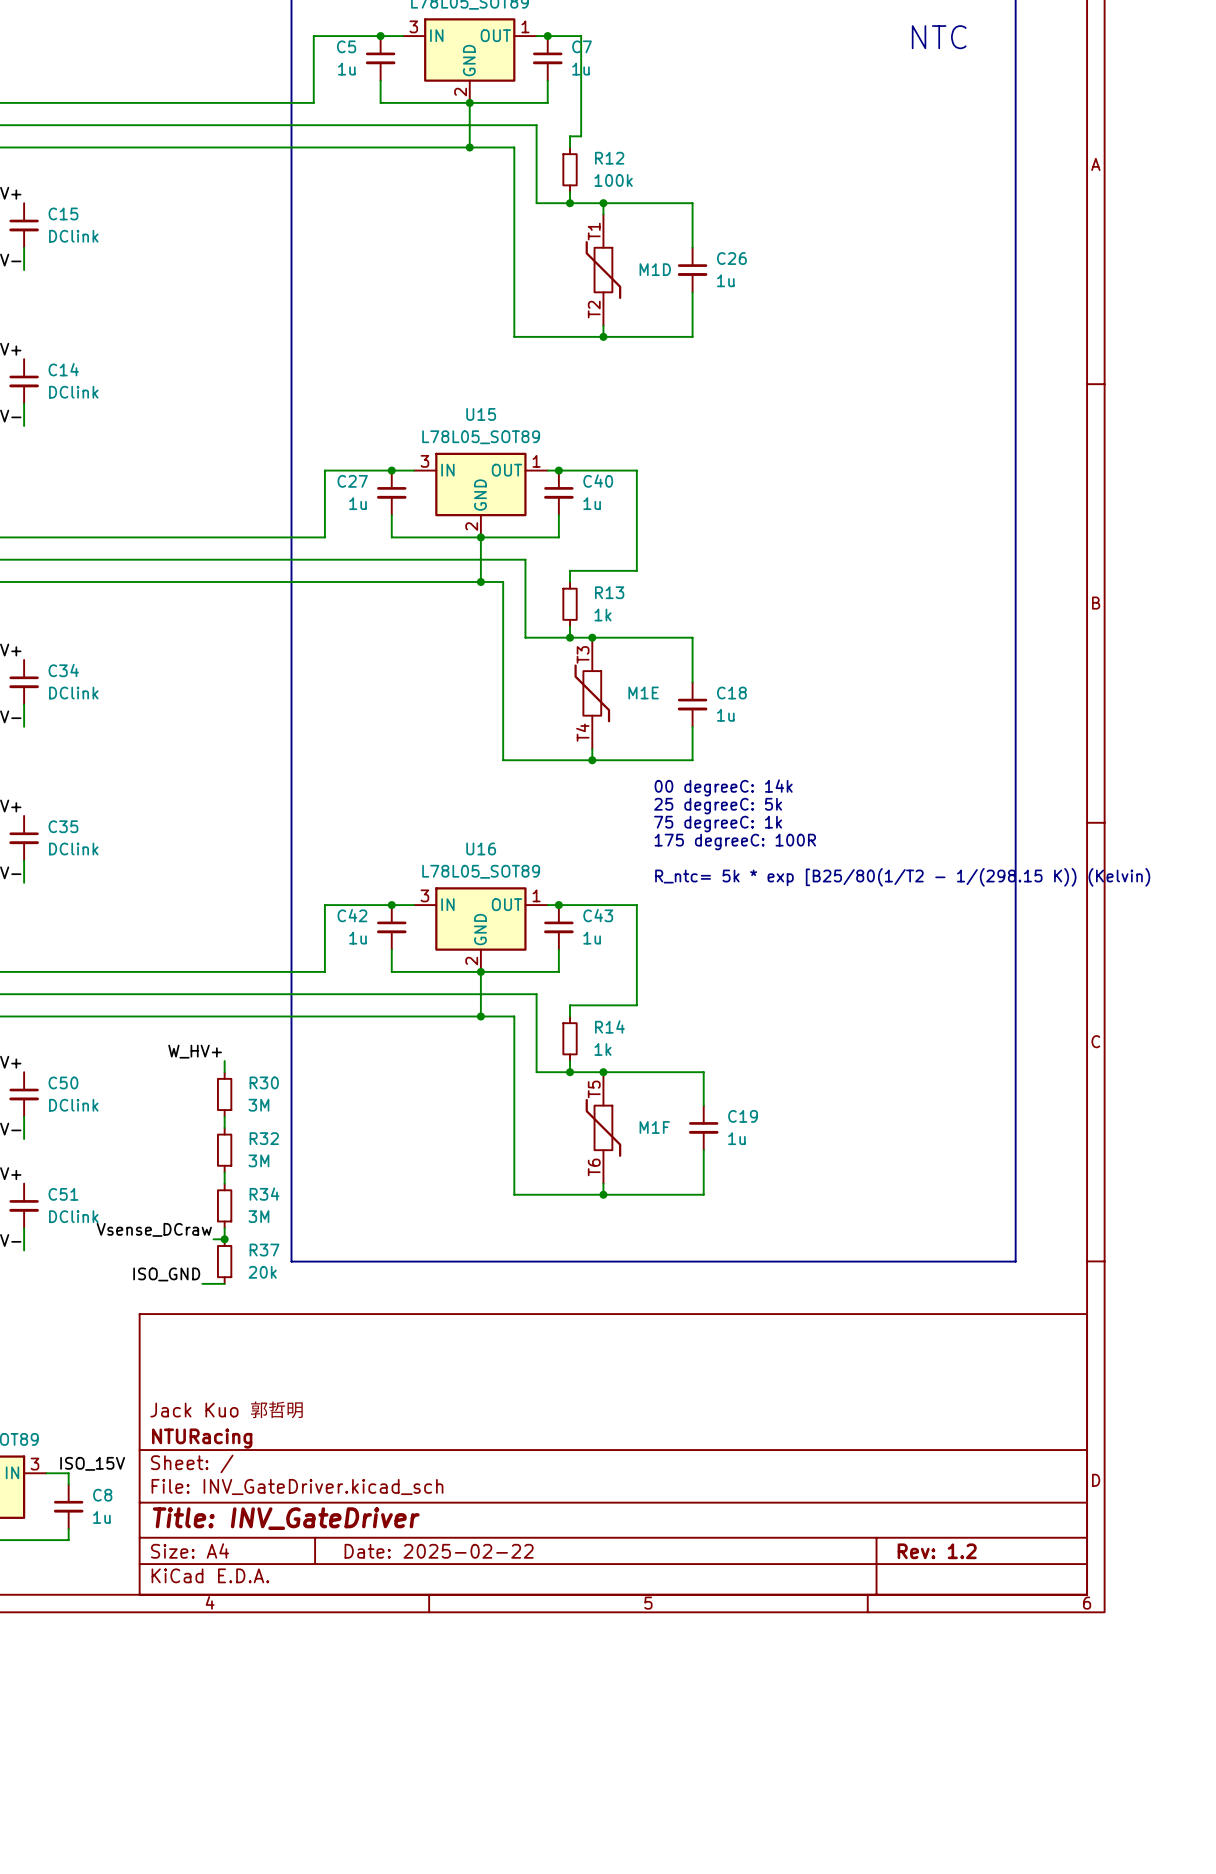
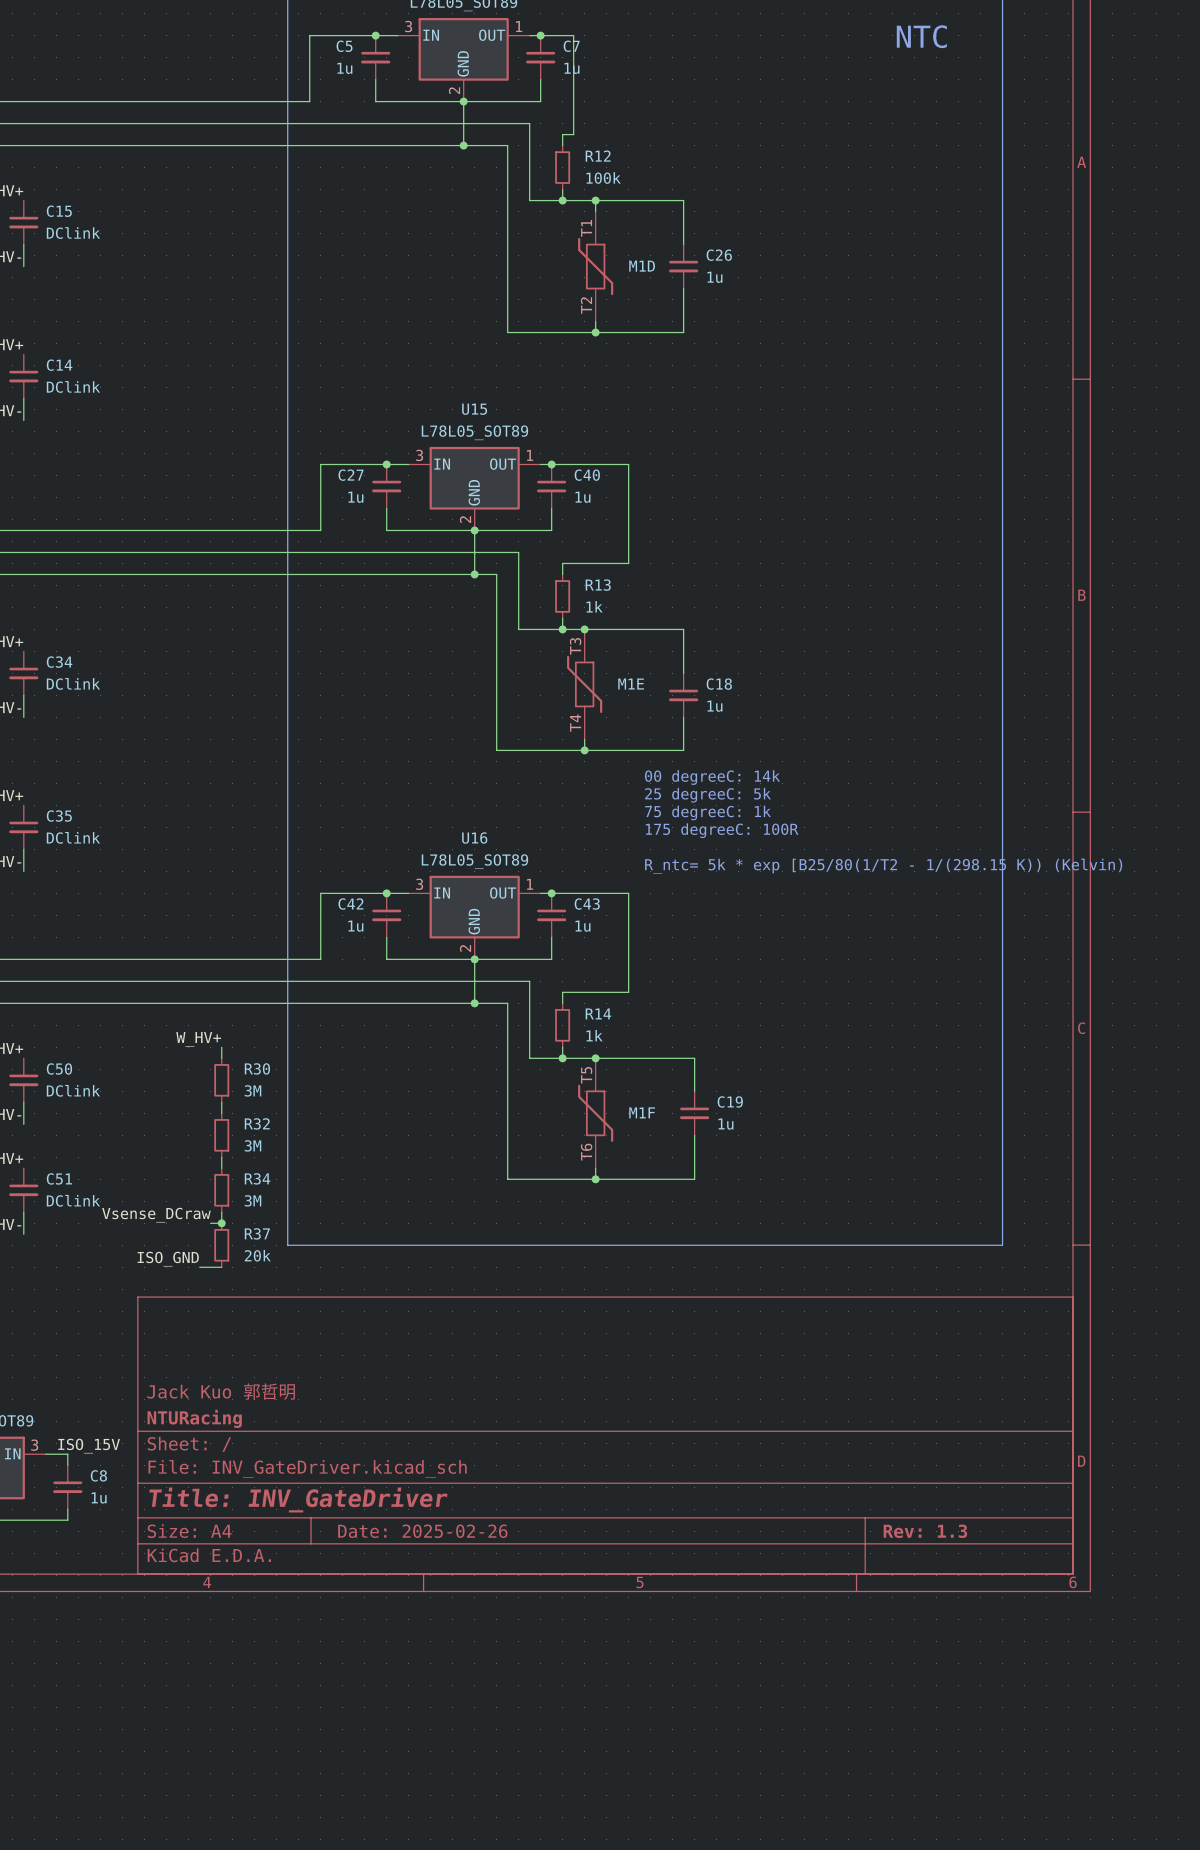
title block: Date: 2025-02-22 (439, 1551) -> Date: 2025-02-26 (422, 1531)
title block: Rev: 1.2 (937, 1551) -> Rev: 1.3 (925, 1531)

